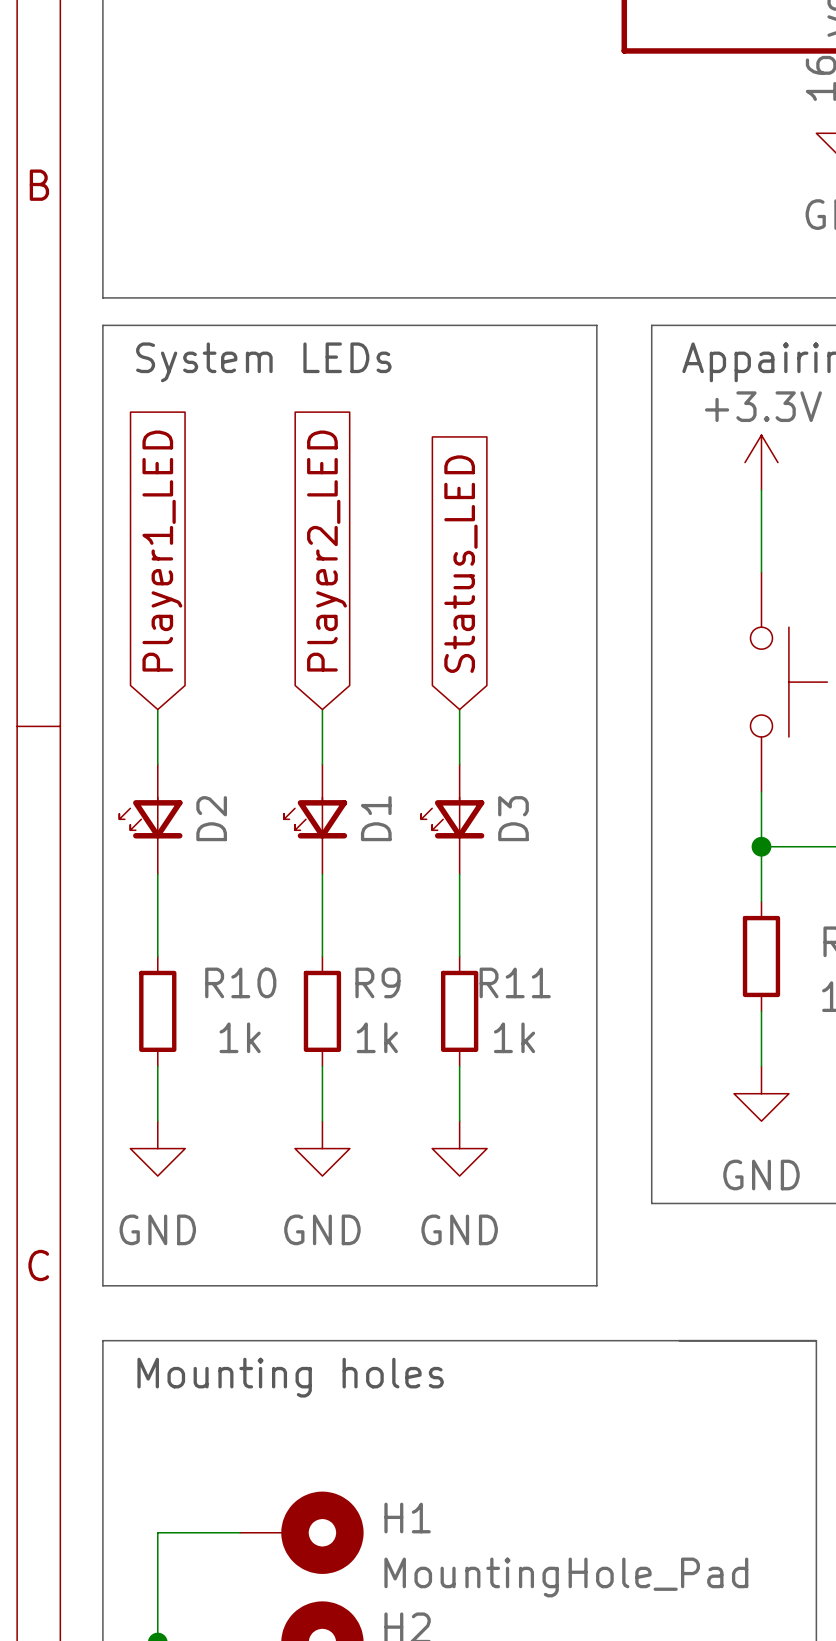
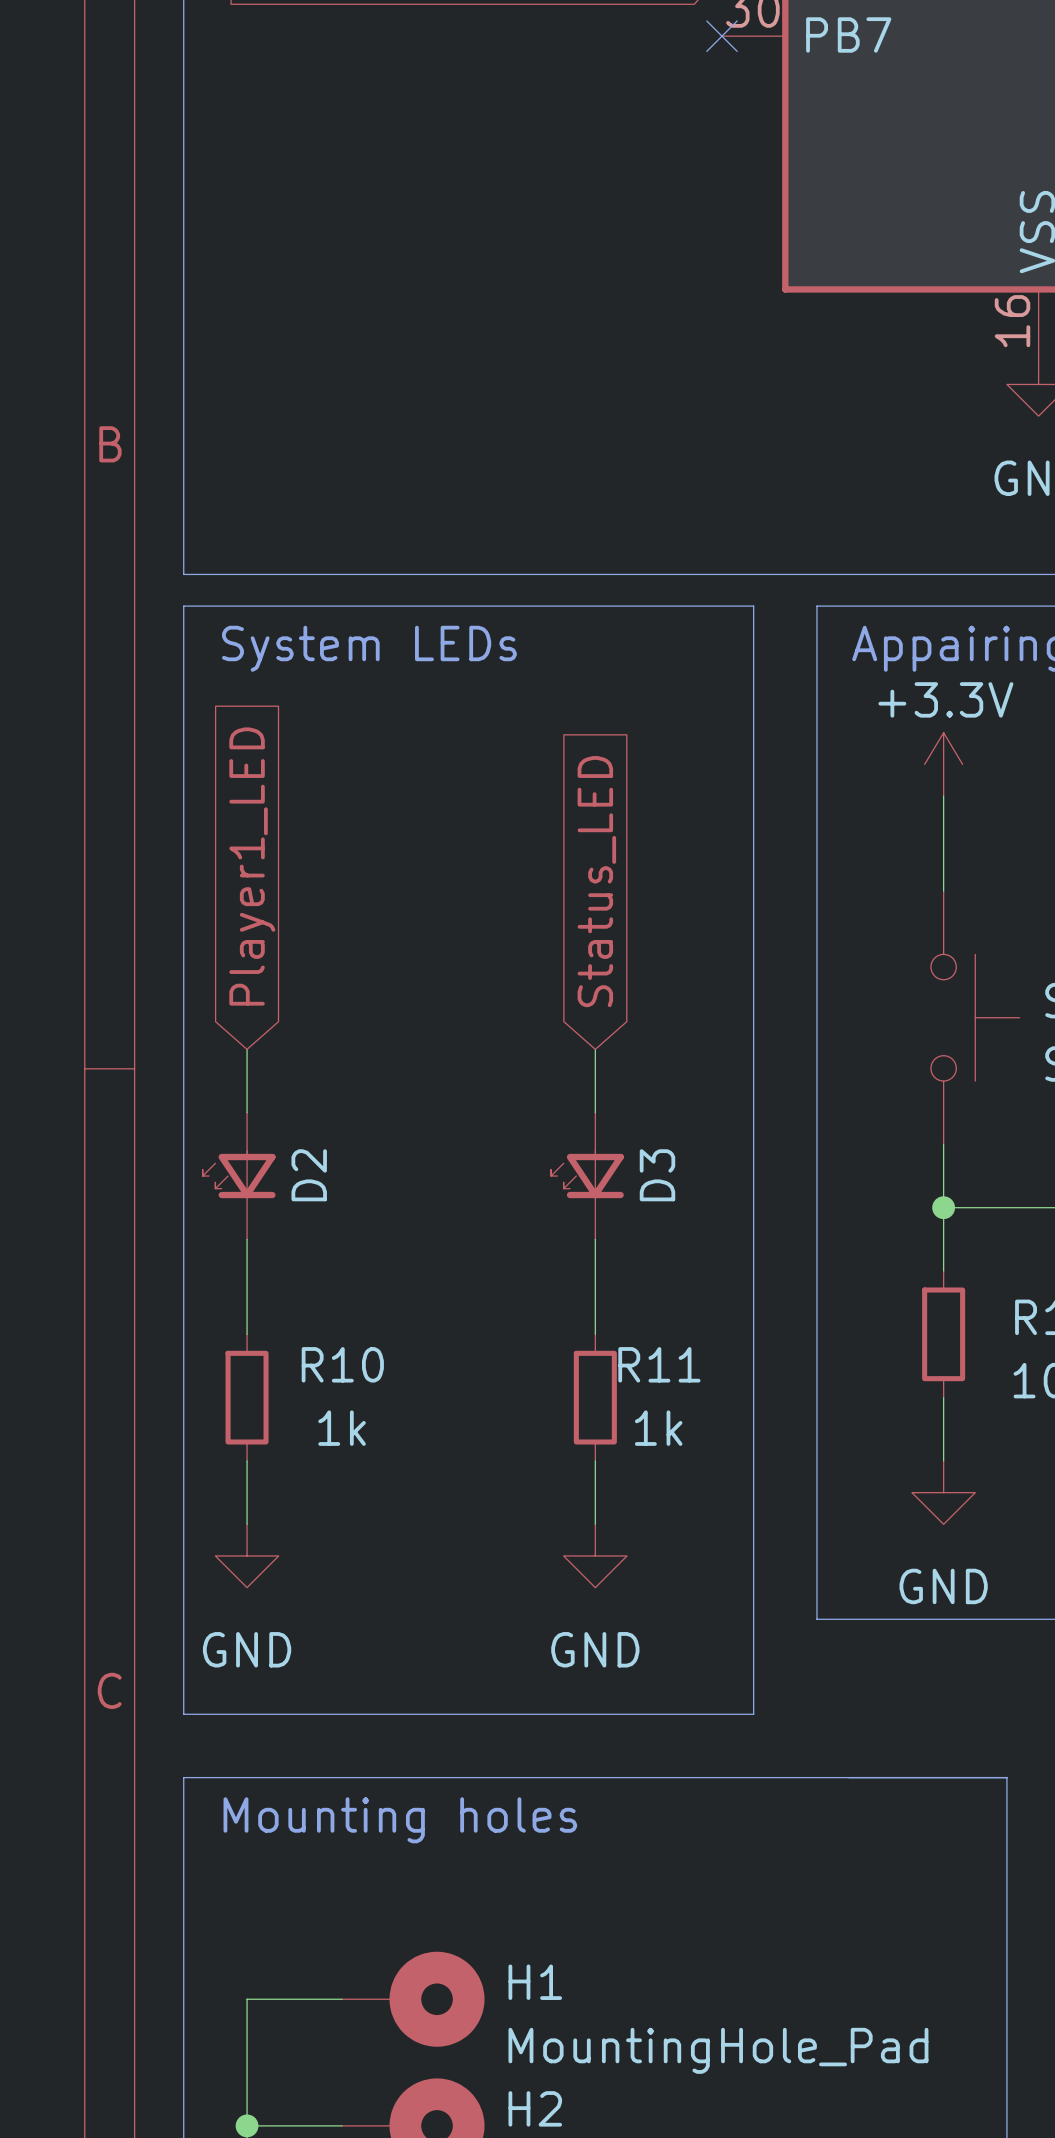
global label: Player2_LED (327, 551) -> none
wire: (322, 709) (322, 764) -> none
D1: (315, 819) -> none
wire: (322, 874) (322, 956) -> none
R9: 1k (322, 1011) -> none
wire: (322, 1066) (322, 1121) -> none
power symbol: GND (322, 1148) -> none

